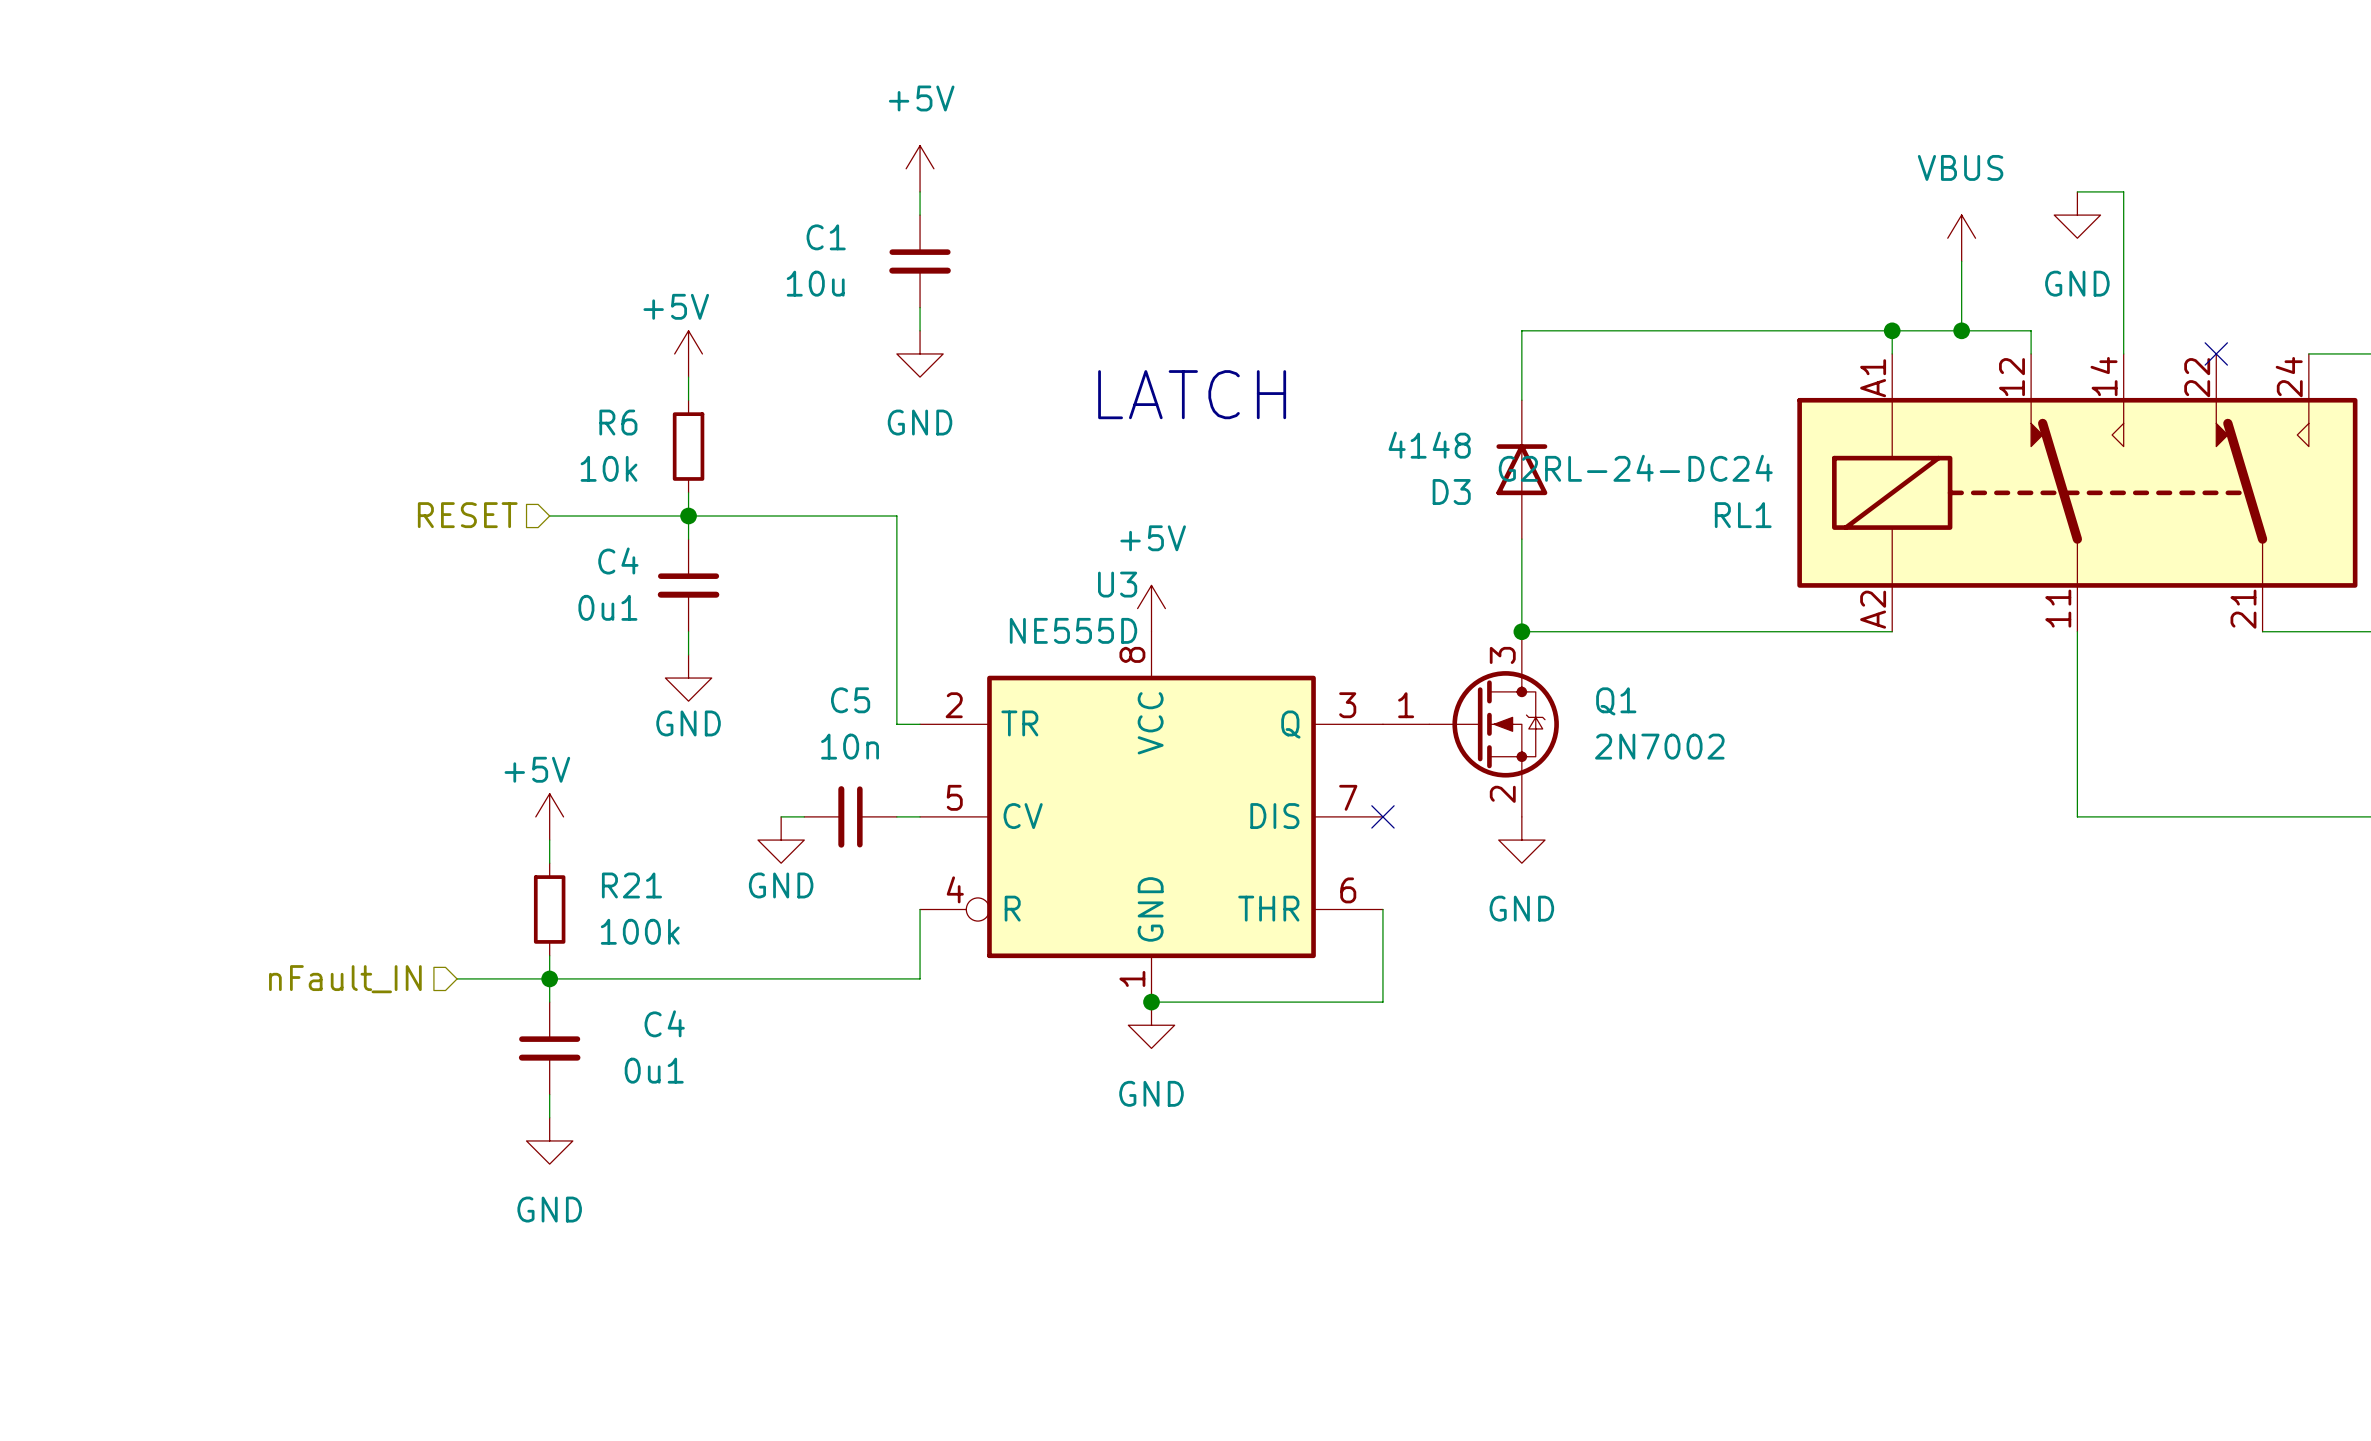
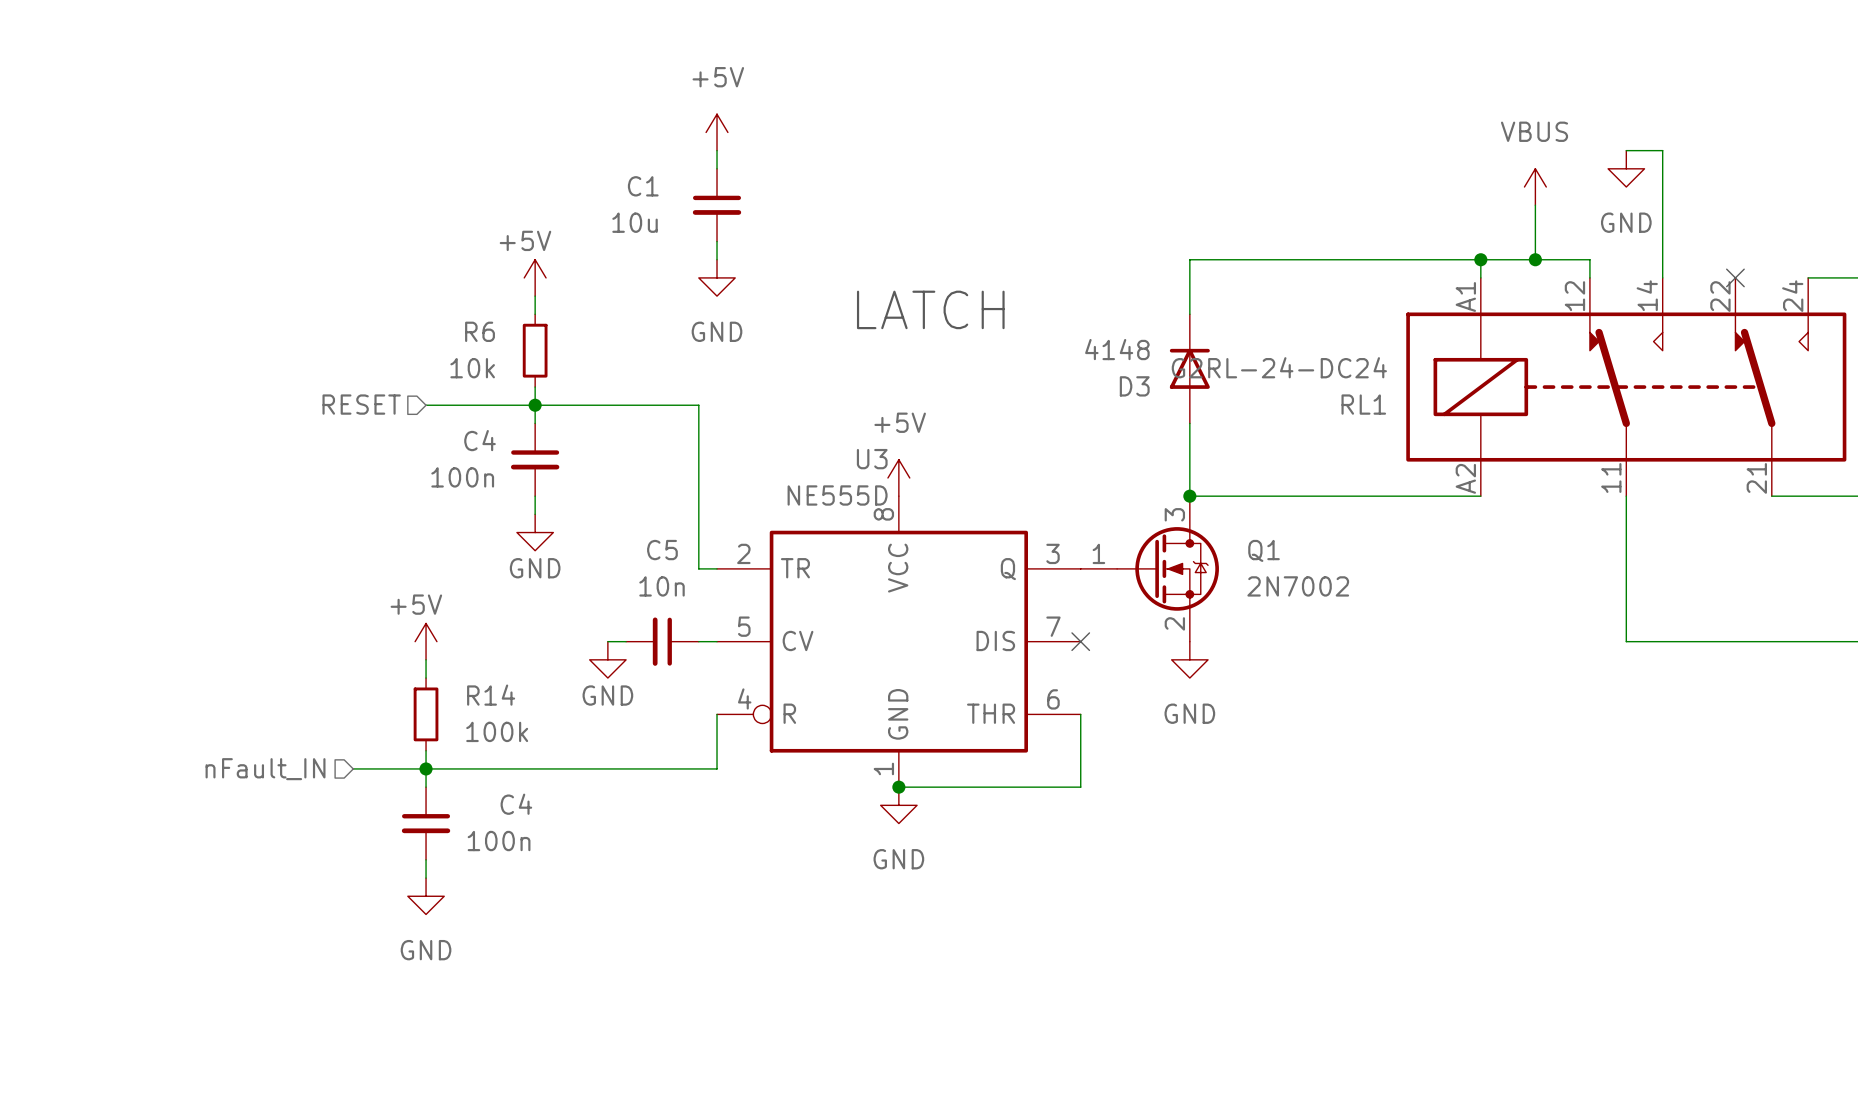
C4 value: 0u1 (607, 607) -> 100n (462, 477)
R21 name: R21 (631, 885) -> R14 (491, 695)
C4 value: 0u1 (654, 1070) -> 100n (499, 841)

